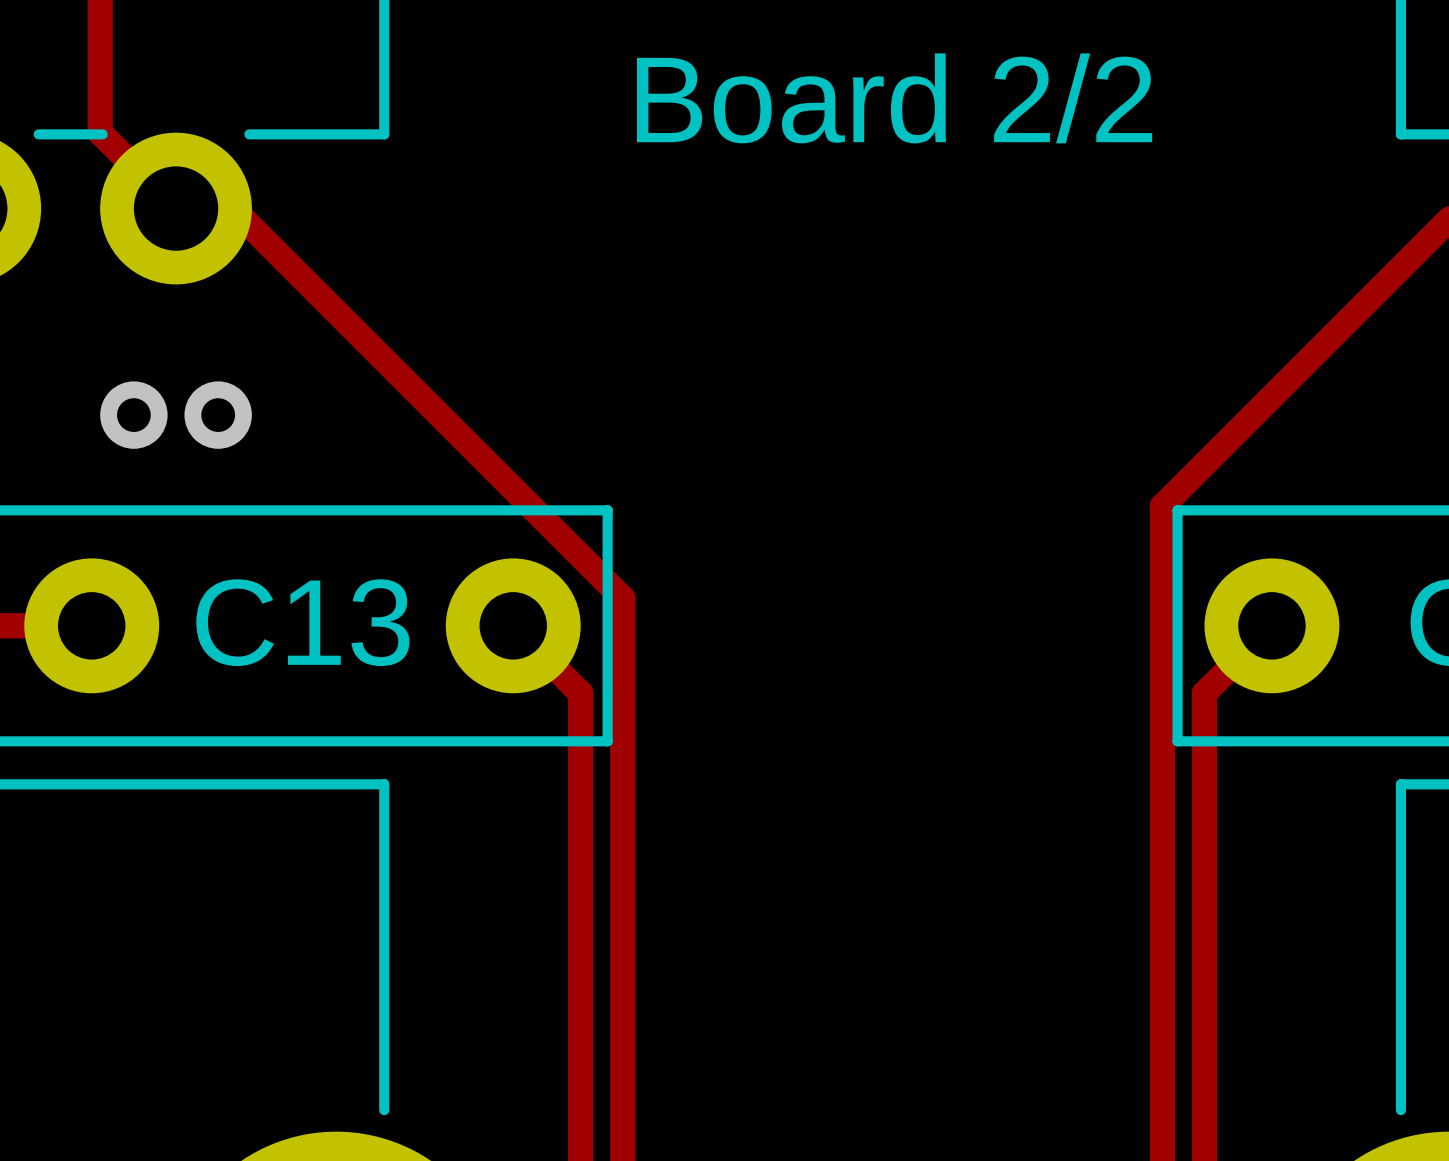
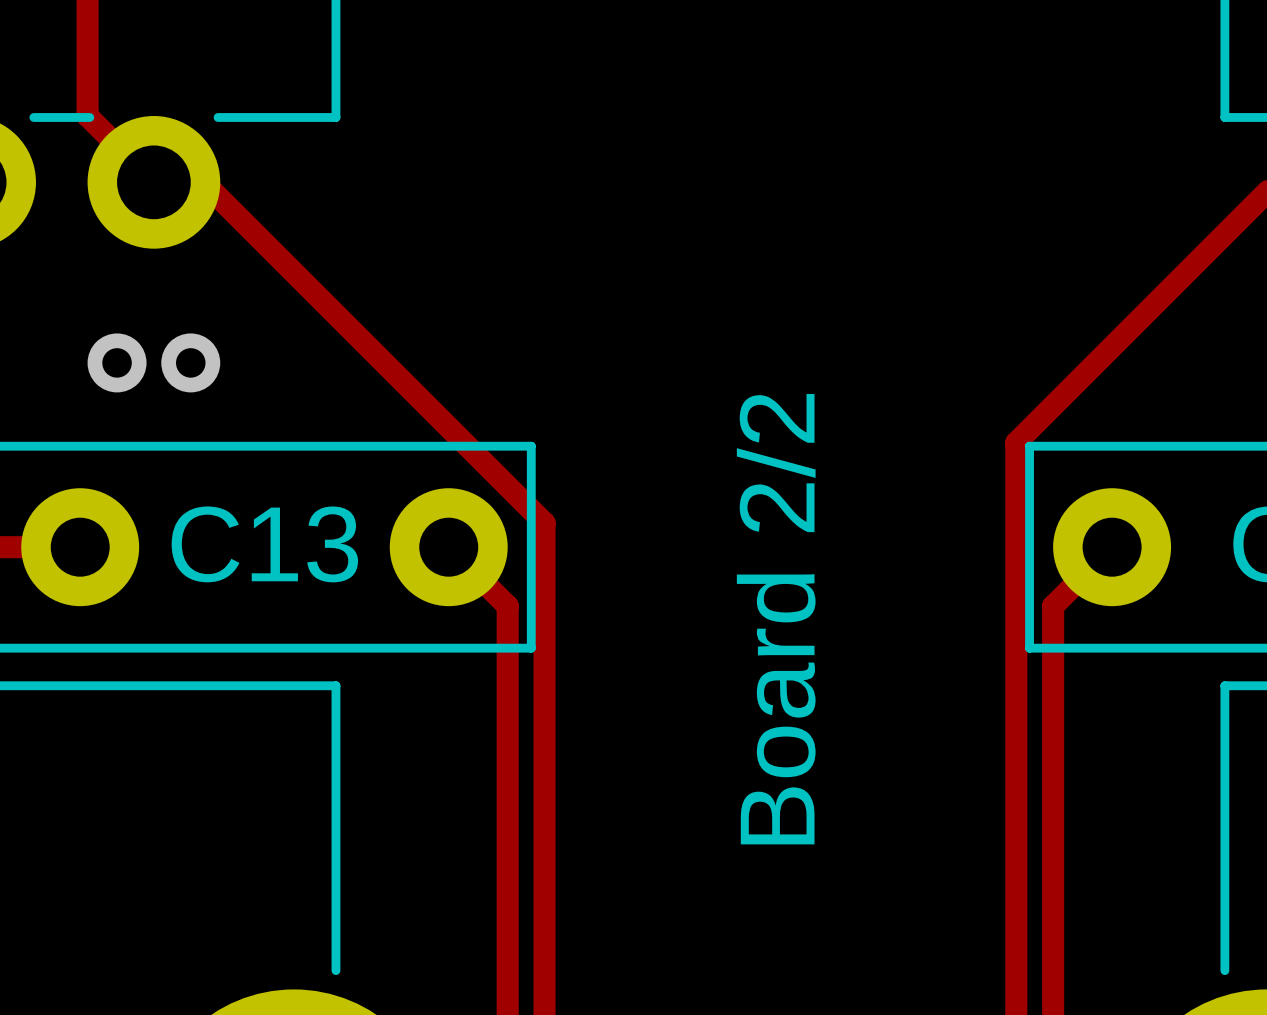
text rotation: 0° (894, 98) -> 90° counterclockwise (776, 619)

